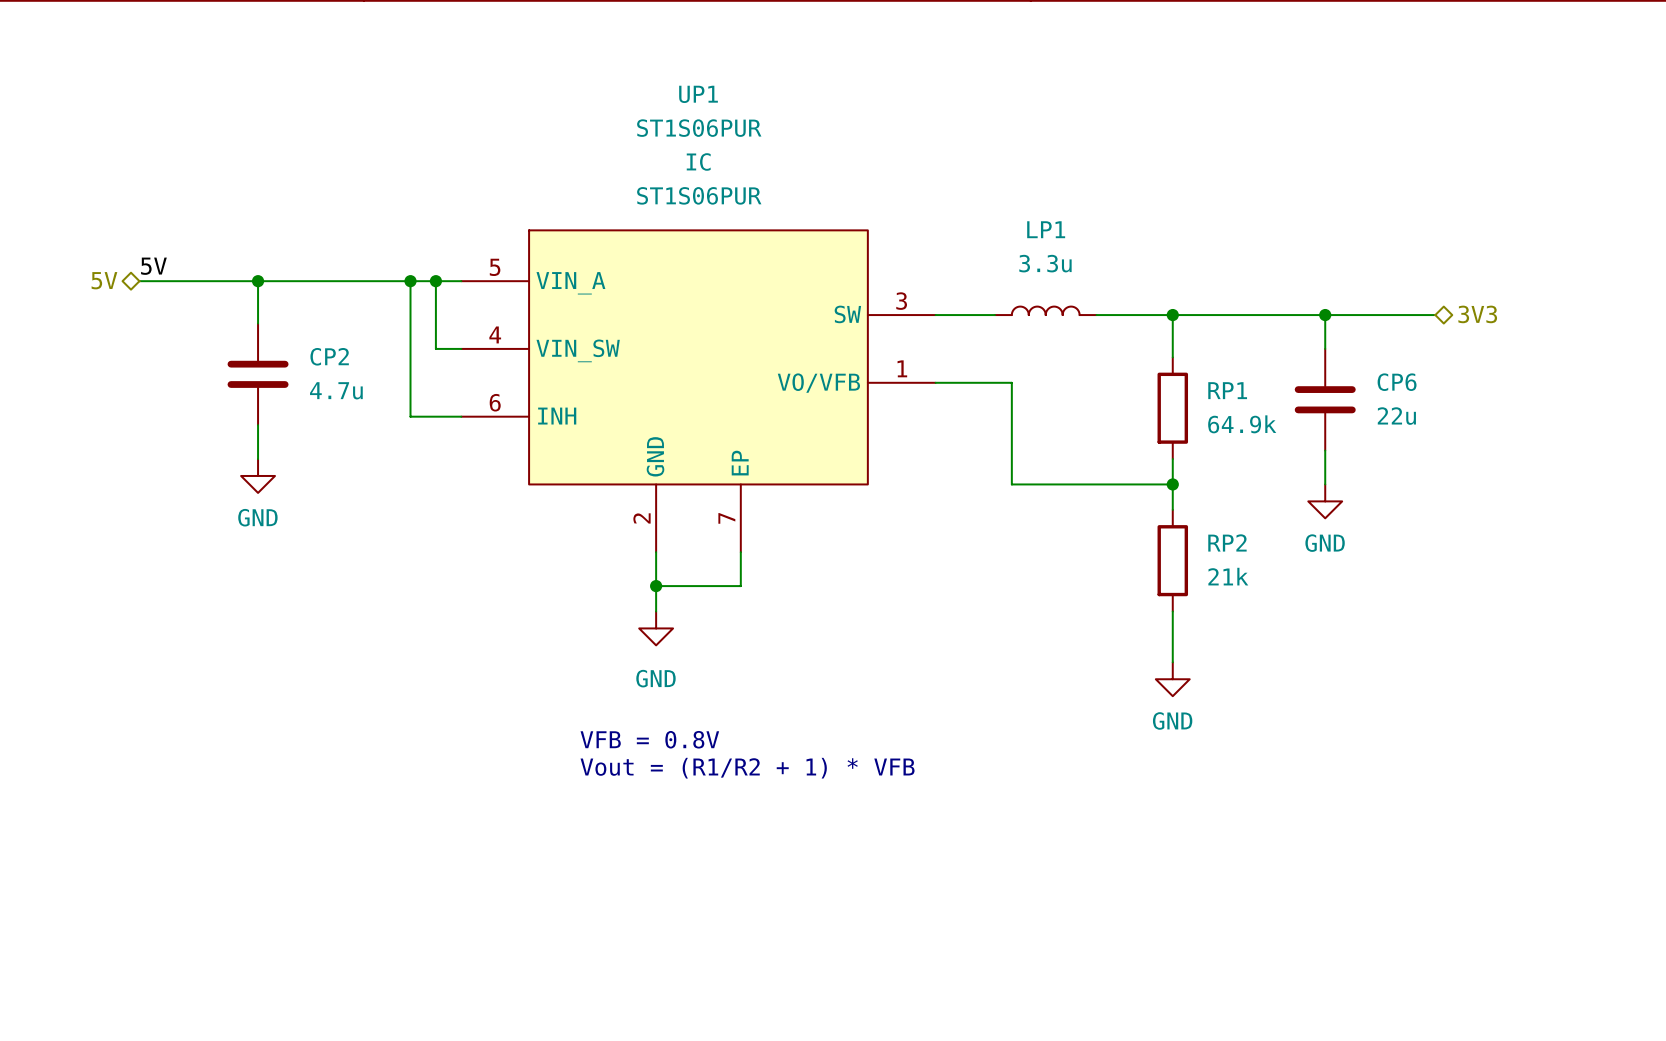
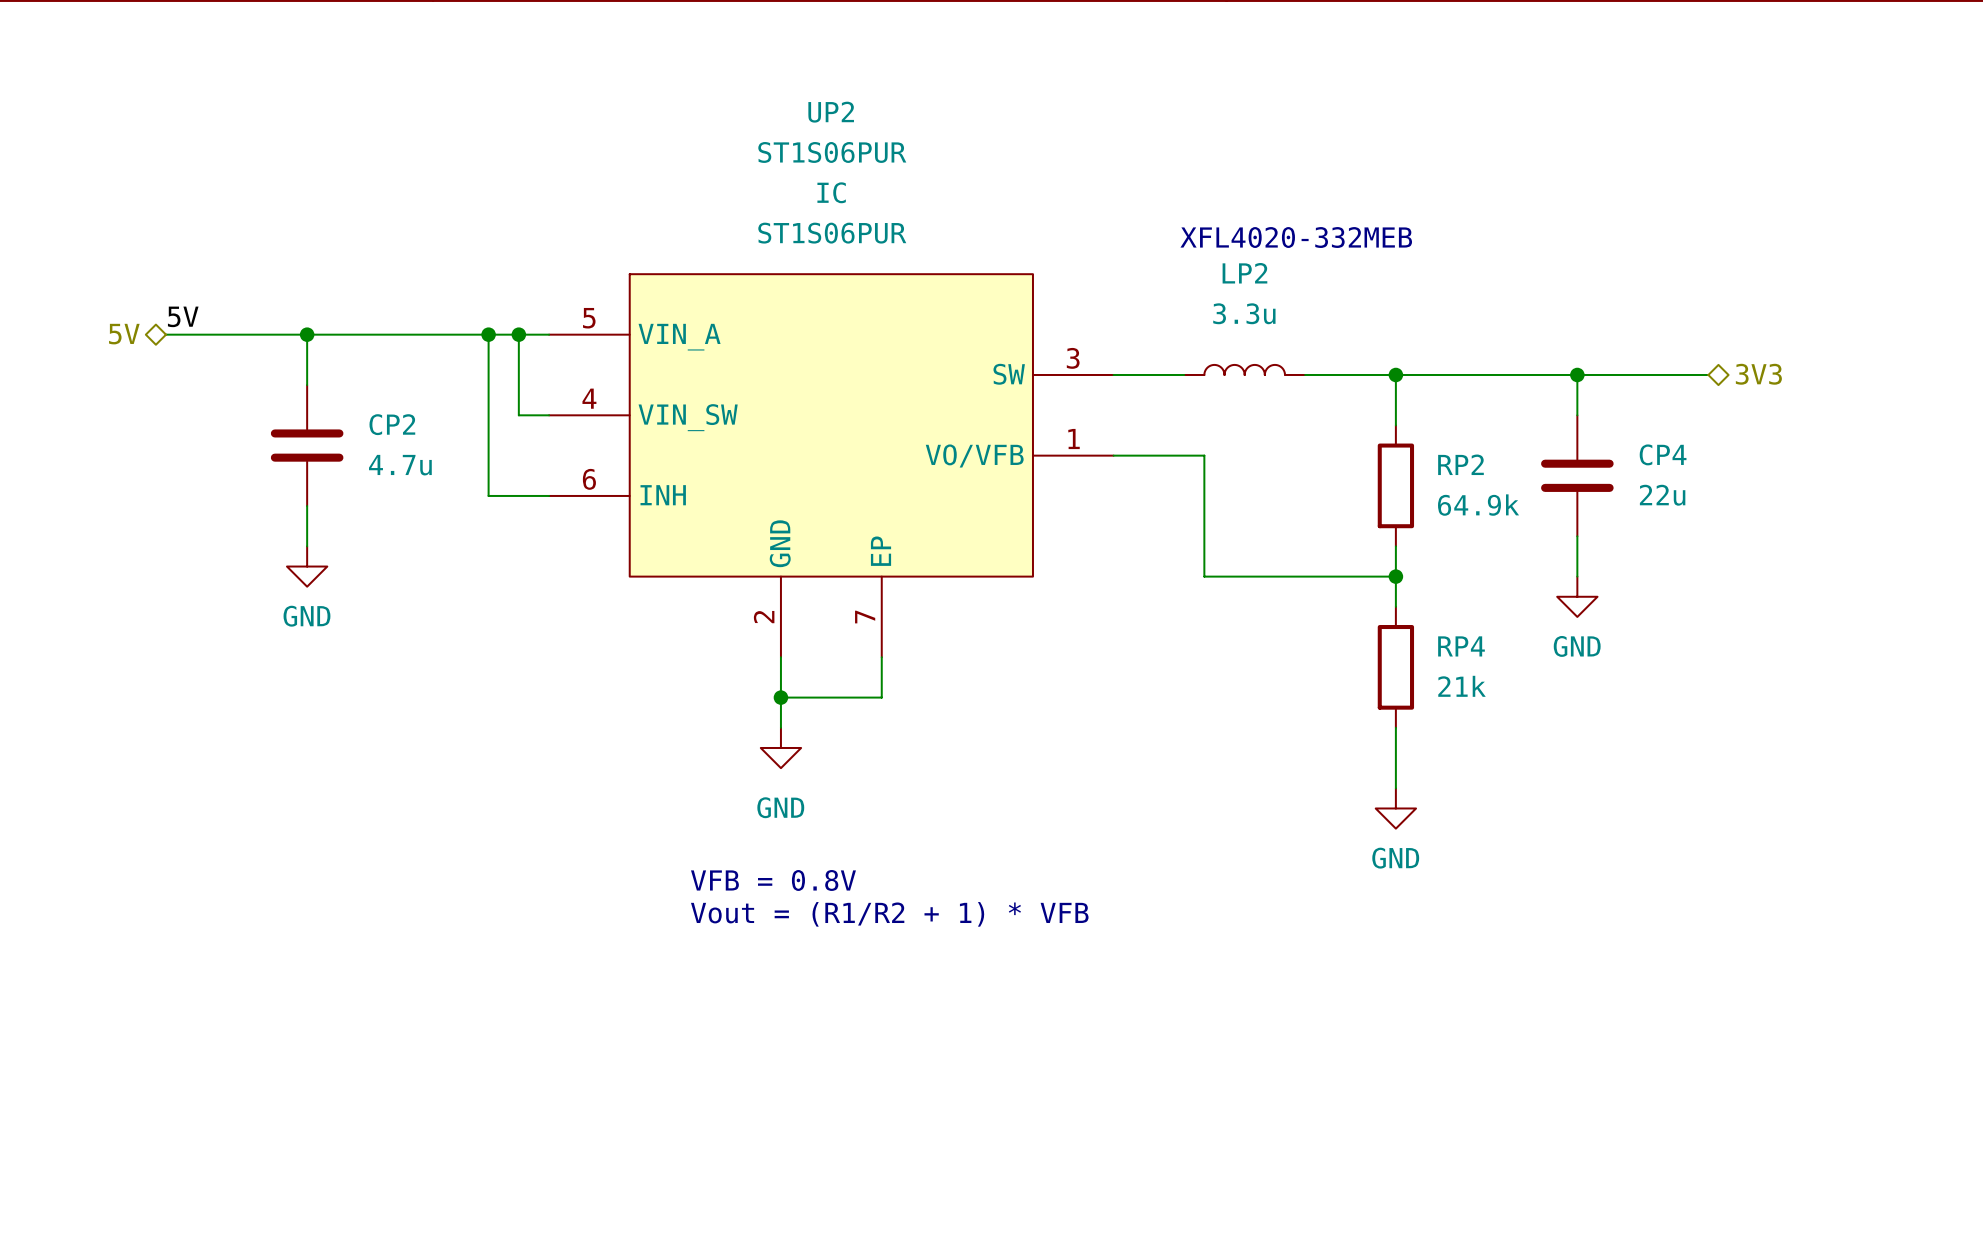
UP1 name: UP1 (698, 94) -> UP2 (831, 112)
text: none -> XFL4020-332MEB (1296, 237)
LP1 name: LP1 (1046, 229) -> LP2 (1244, 273)
CP6 name: CP6 (1397, 382) -> CP4 (1663, 454)
RP1 name: RP1 (1227, 390) -> RP2 (1460, 464)
RP2 name: RP2 (1227, 542) -> RP4 (1461, 646)

